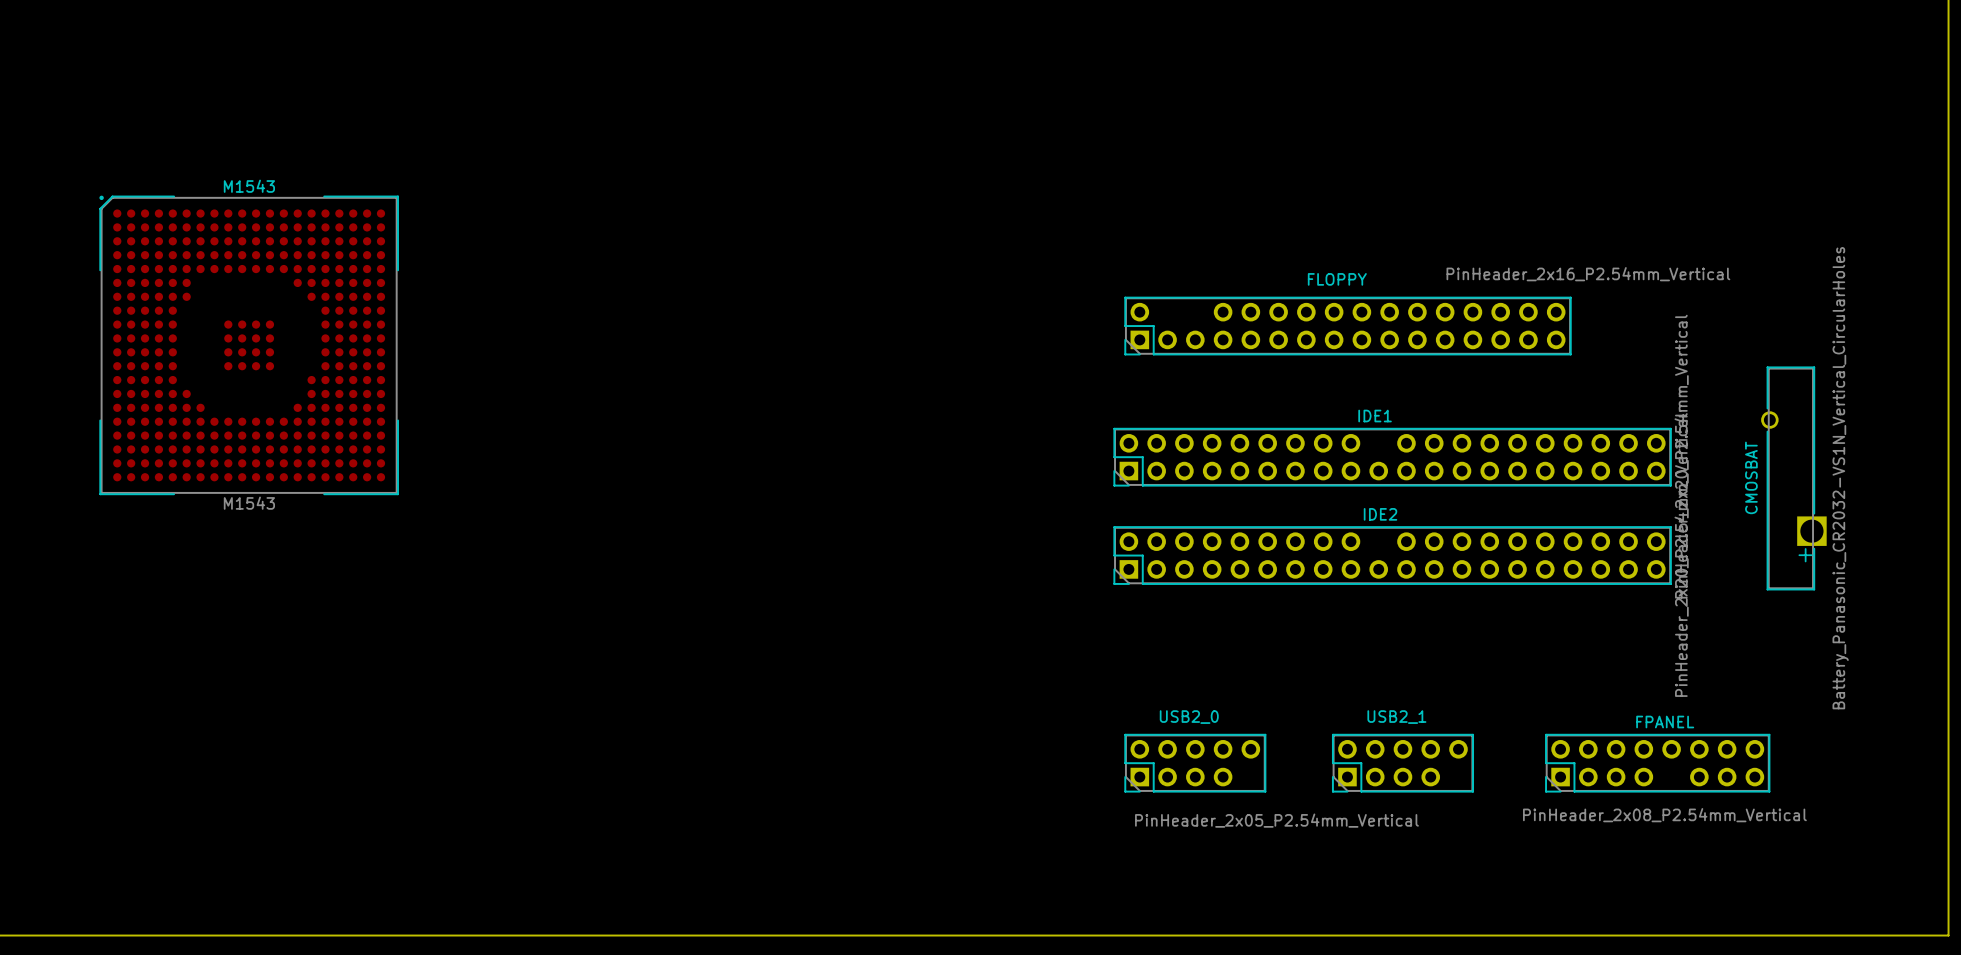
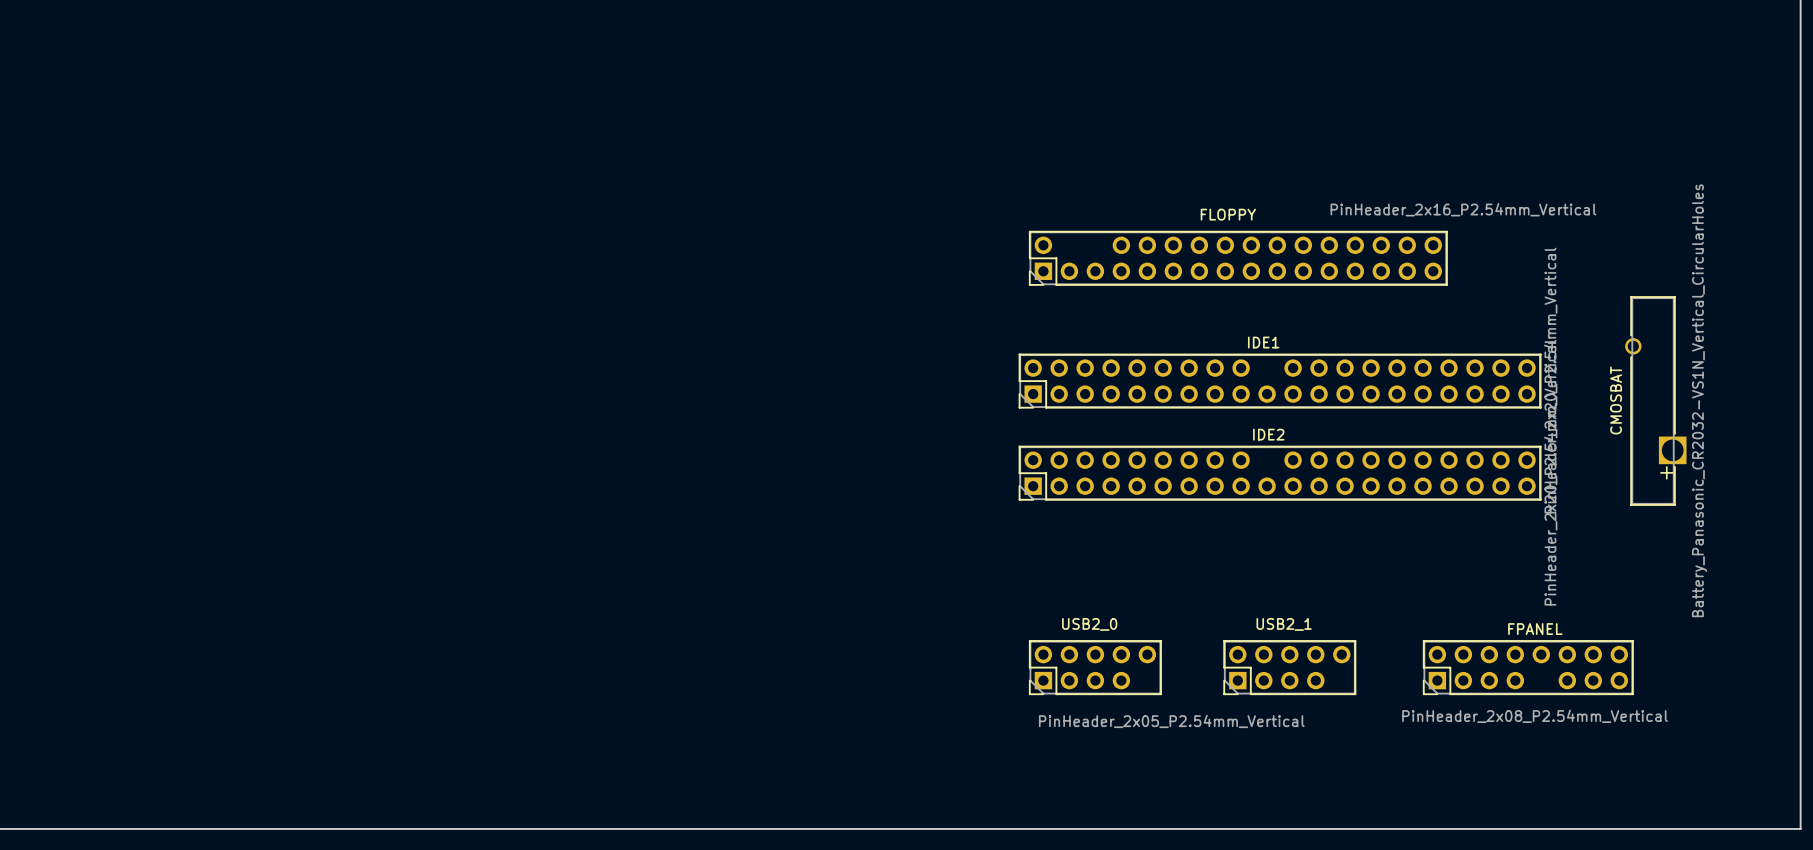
M1543: M1543 (249, 345) -> none

